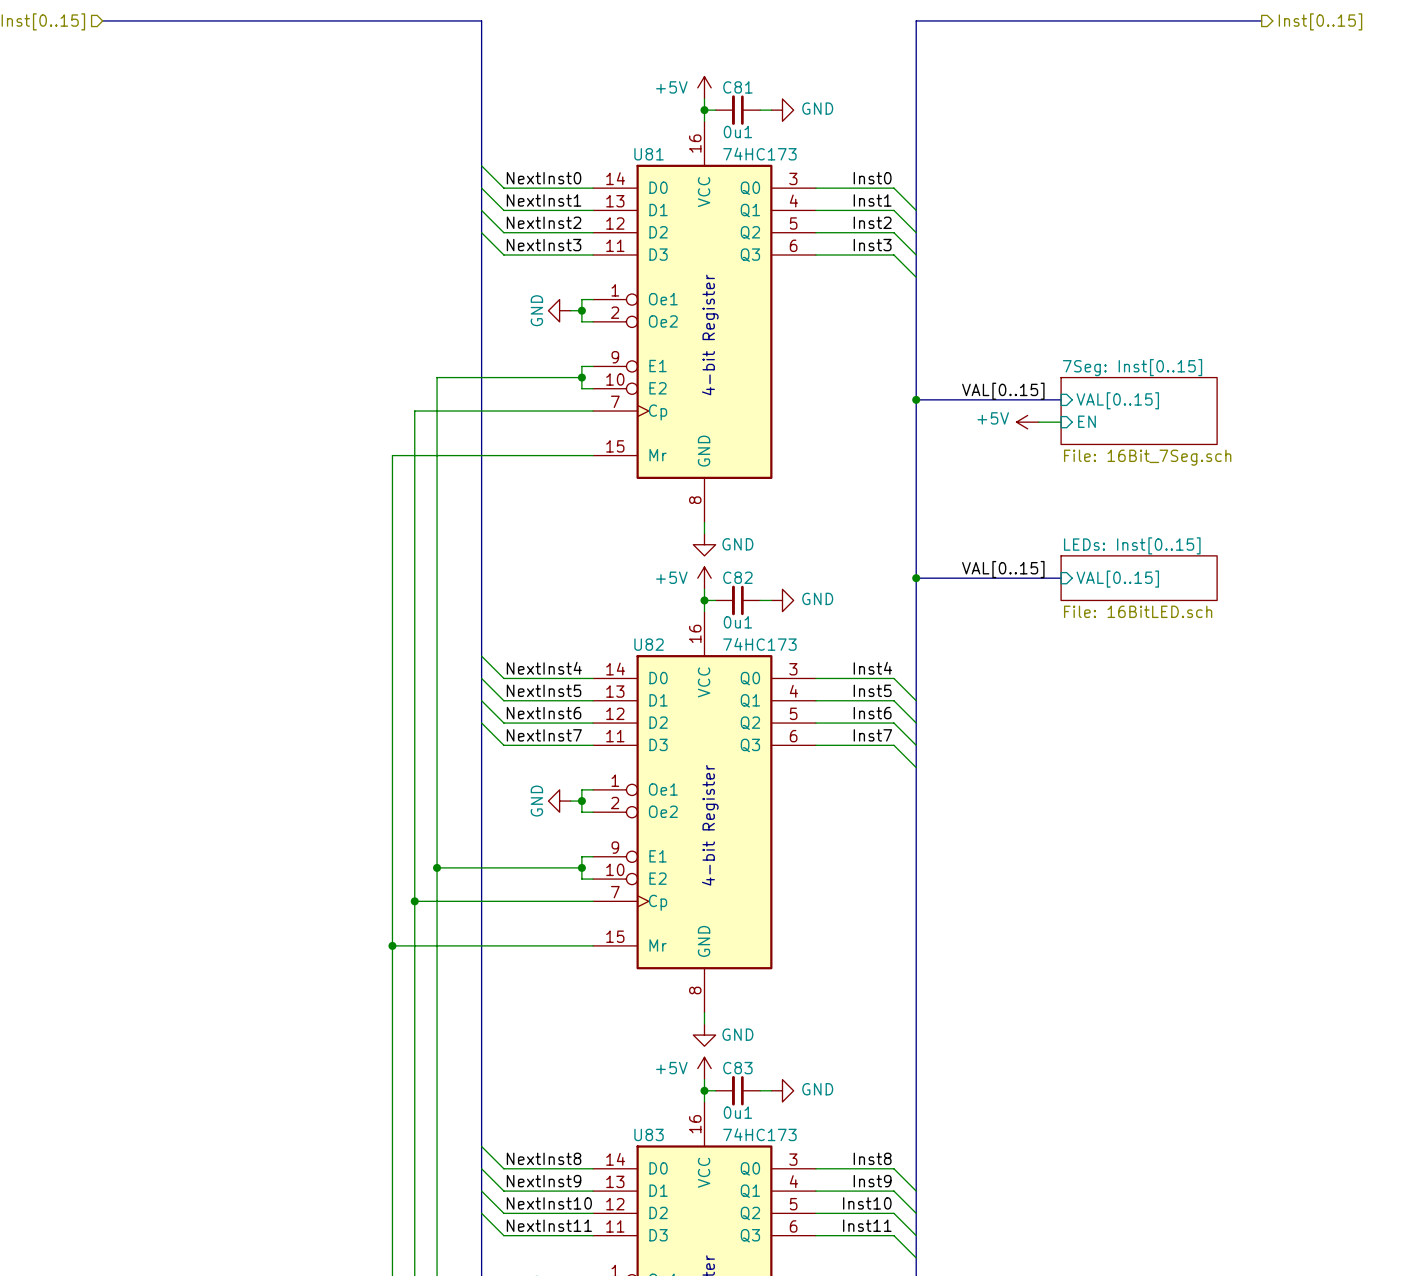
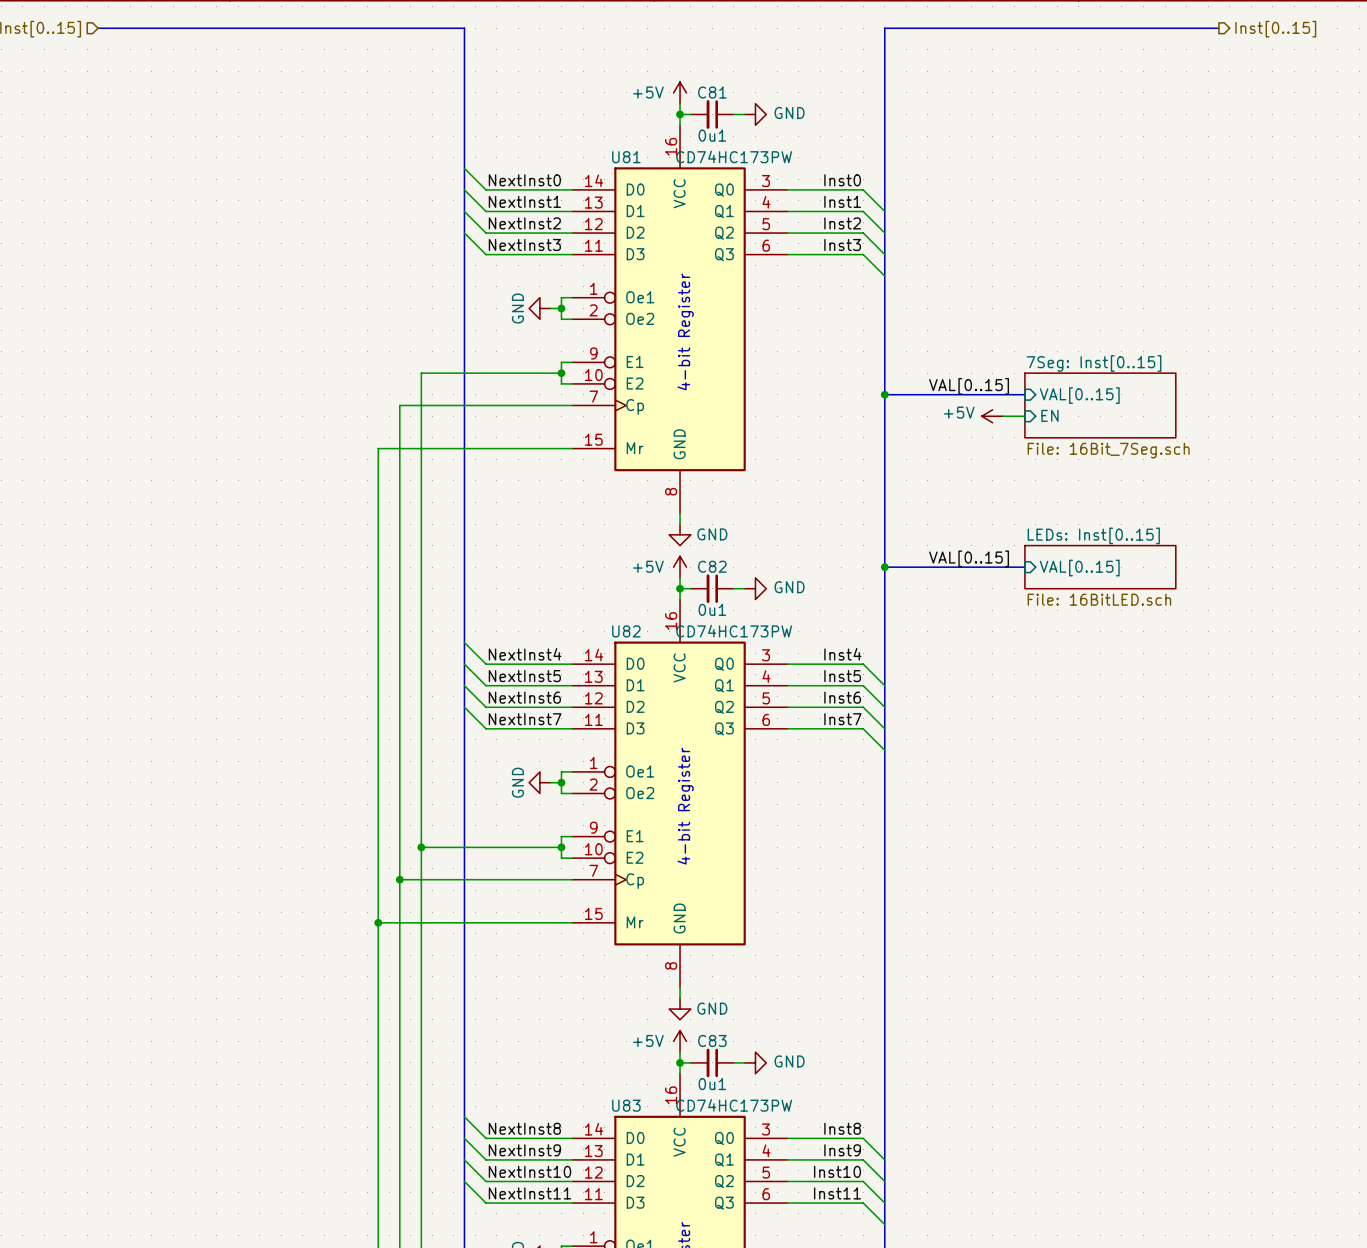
U81 value: 74HC173 (759, 154) -> CD74HC173PW (734, 156)
U82 value: 74HC173 (759, 644) -> CD74HC173PW (734, 631)
U83 value: 74HC173 (759, 1134) -> CD74HC173PW (734, 1105)

